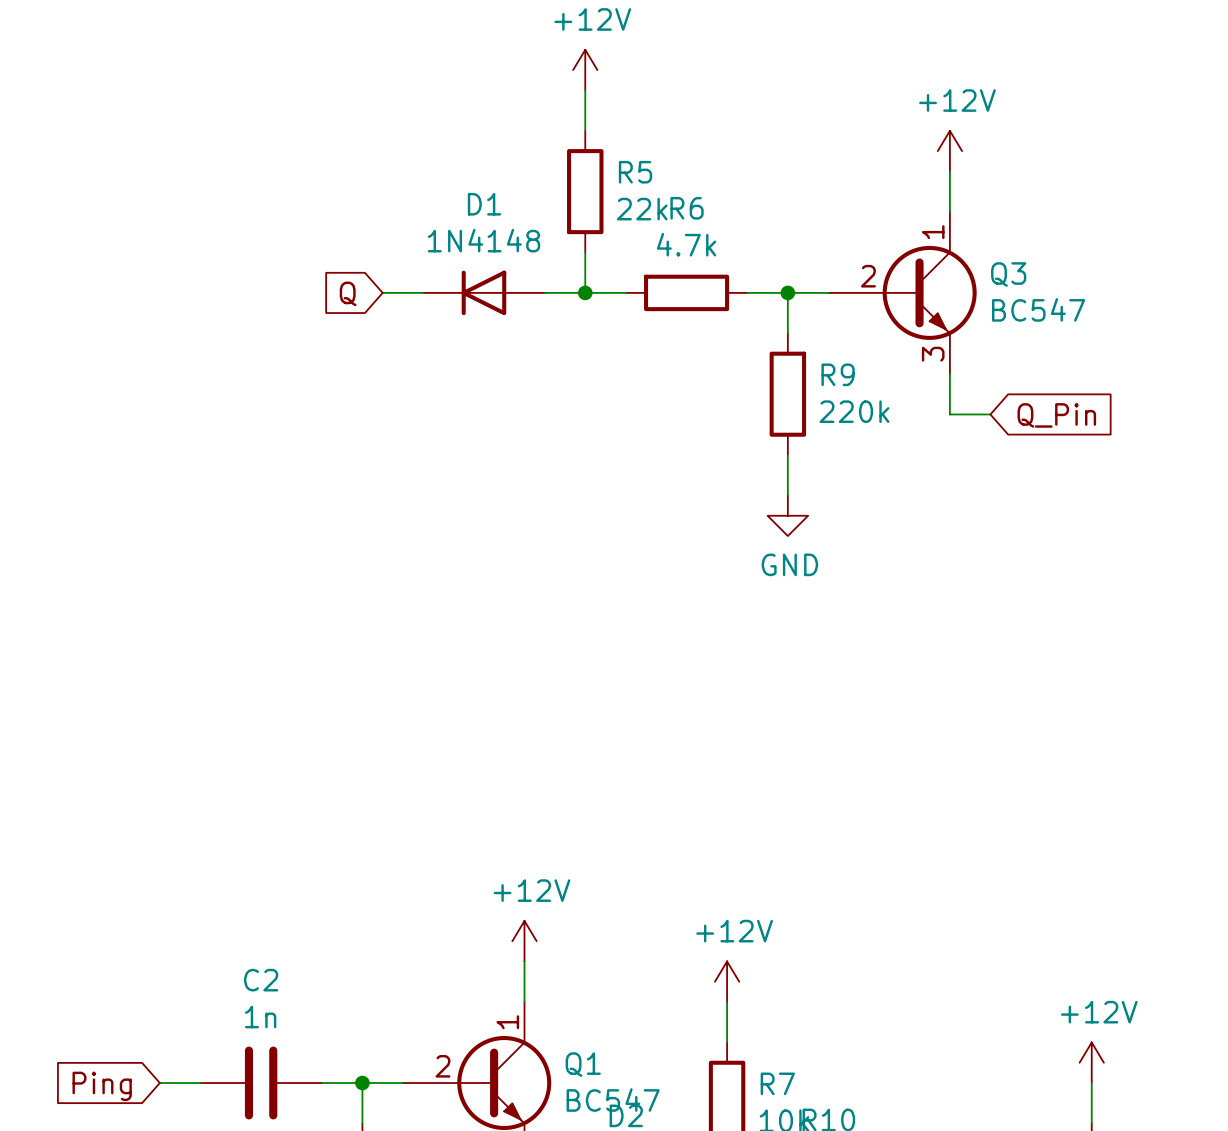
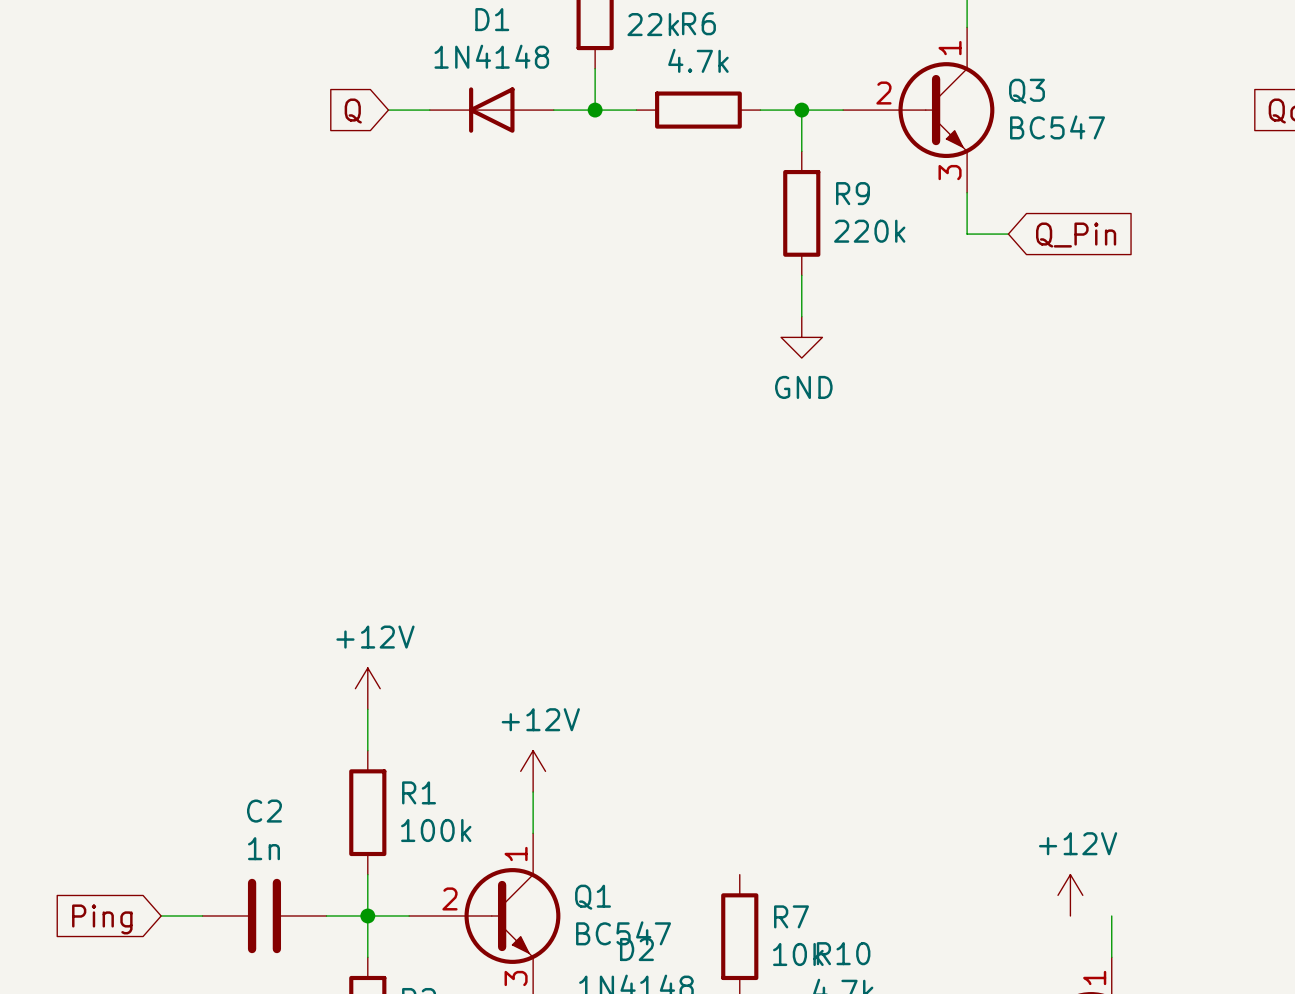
power symbol: none -> +12V (367, 688)
wire: none -> (367, 709) (367, 750)
R1: none -> 100k (367, 812)
power symbol: +12V (727, 981) -> none
wire: (727, 1001) (727, 1042) -> (367, 874) (367, 916)
power symbol position: +12V (1091, 1062) -> +12V (1070, 895)

